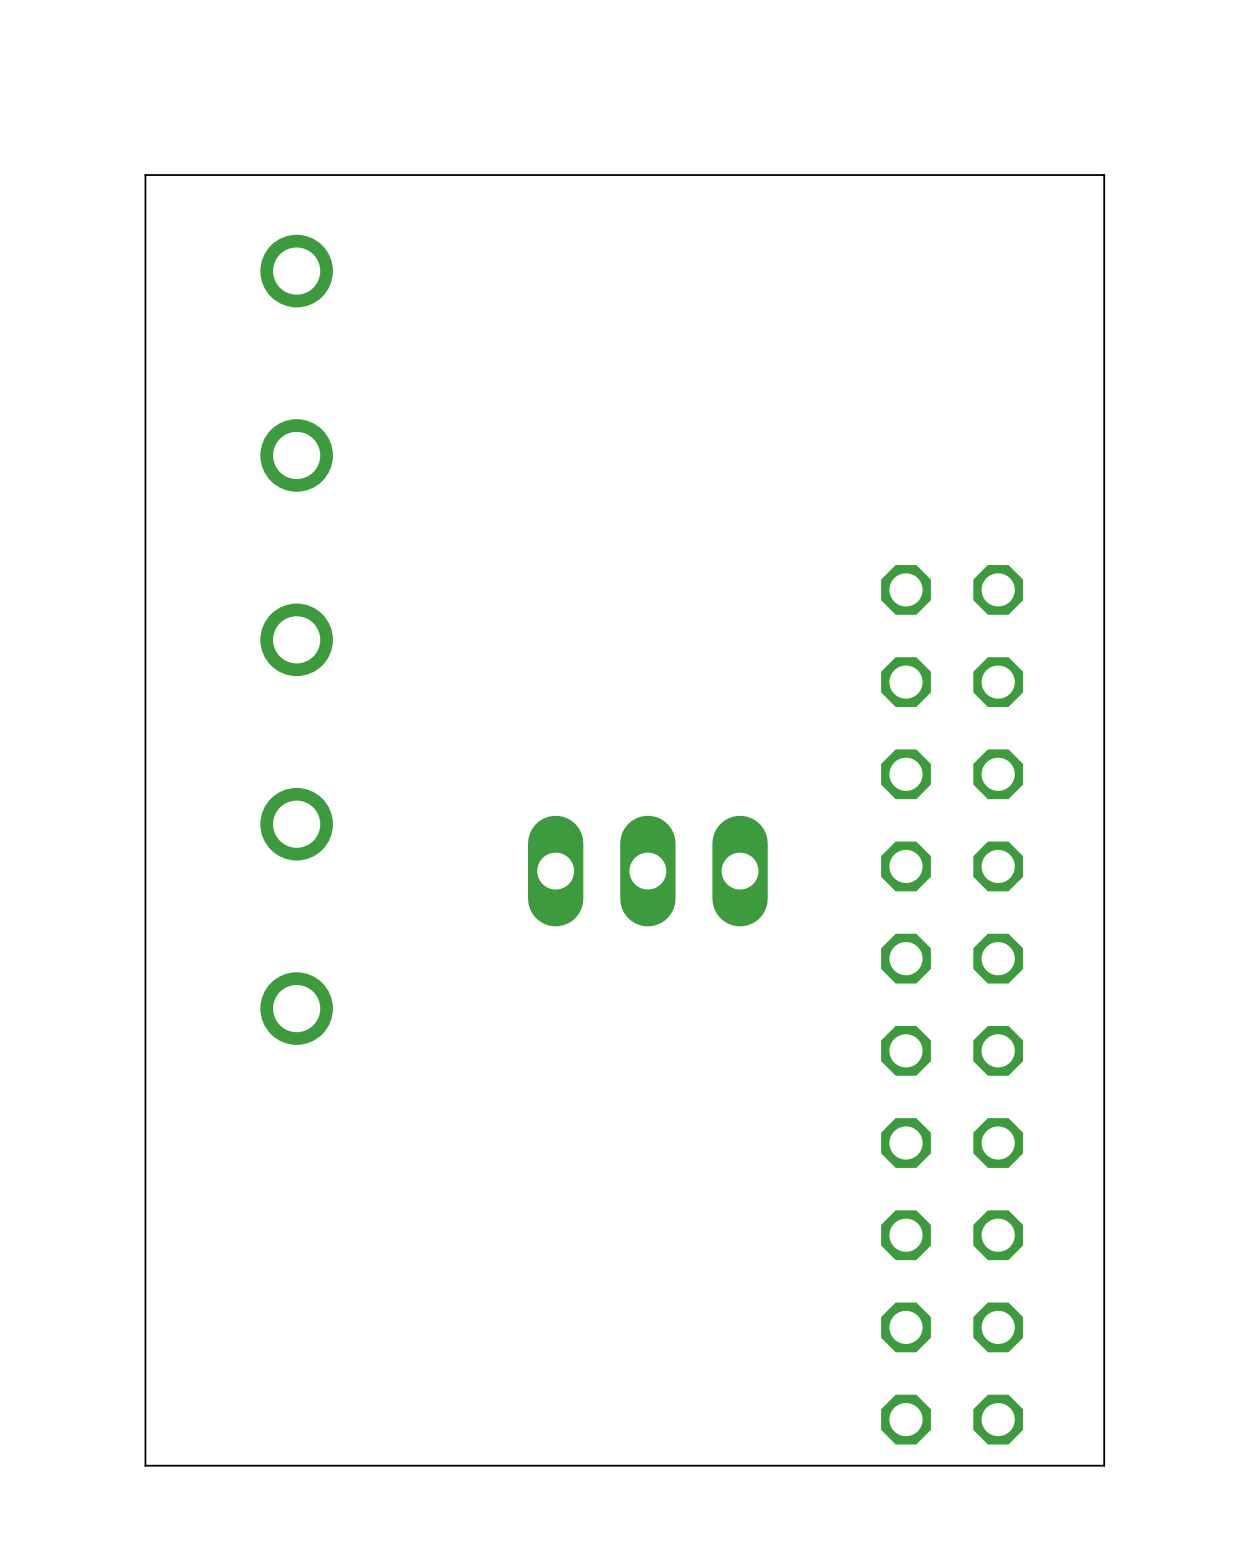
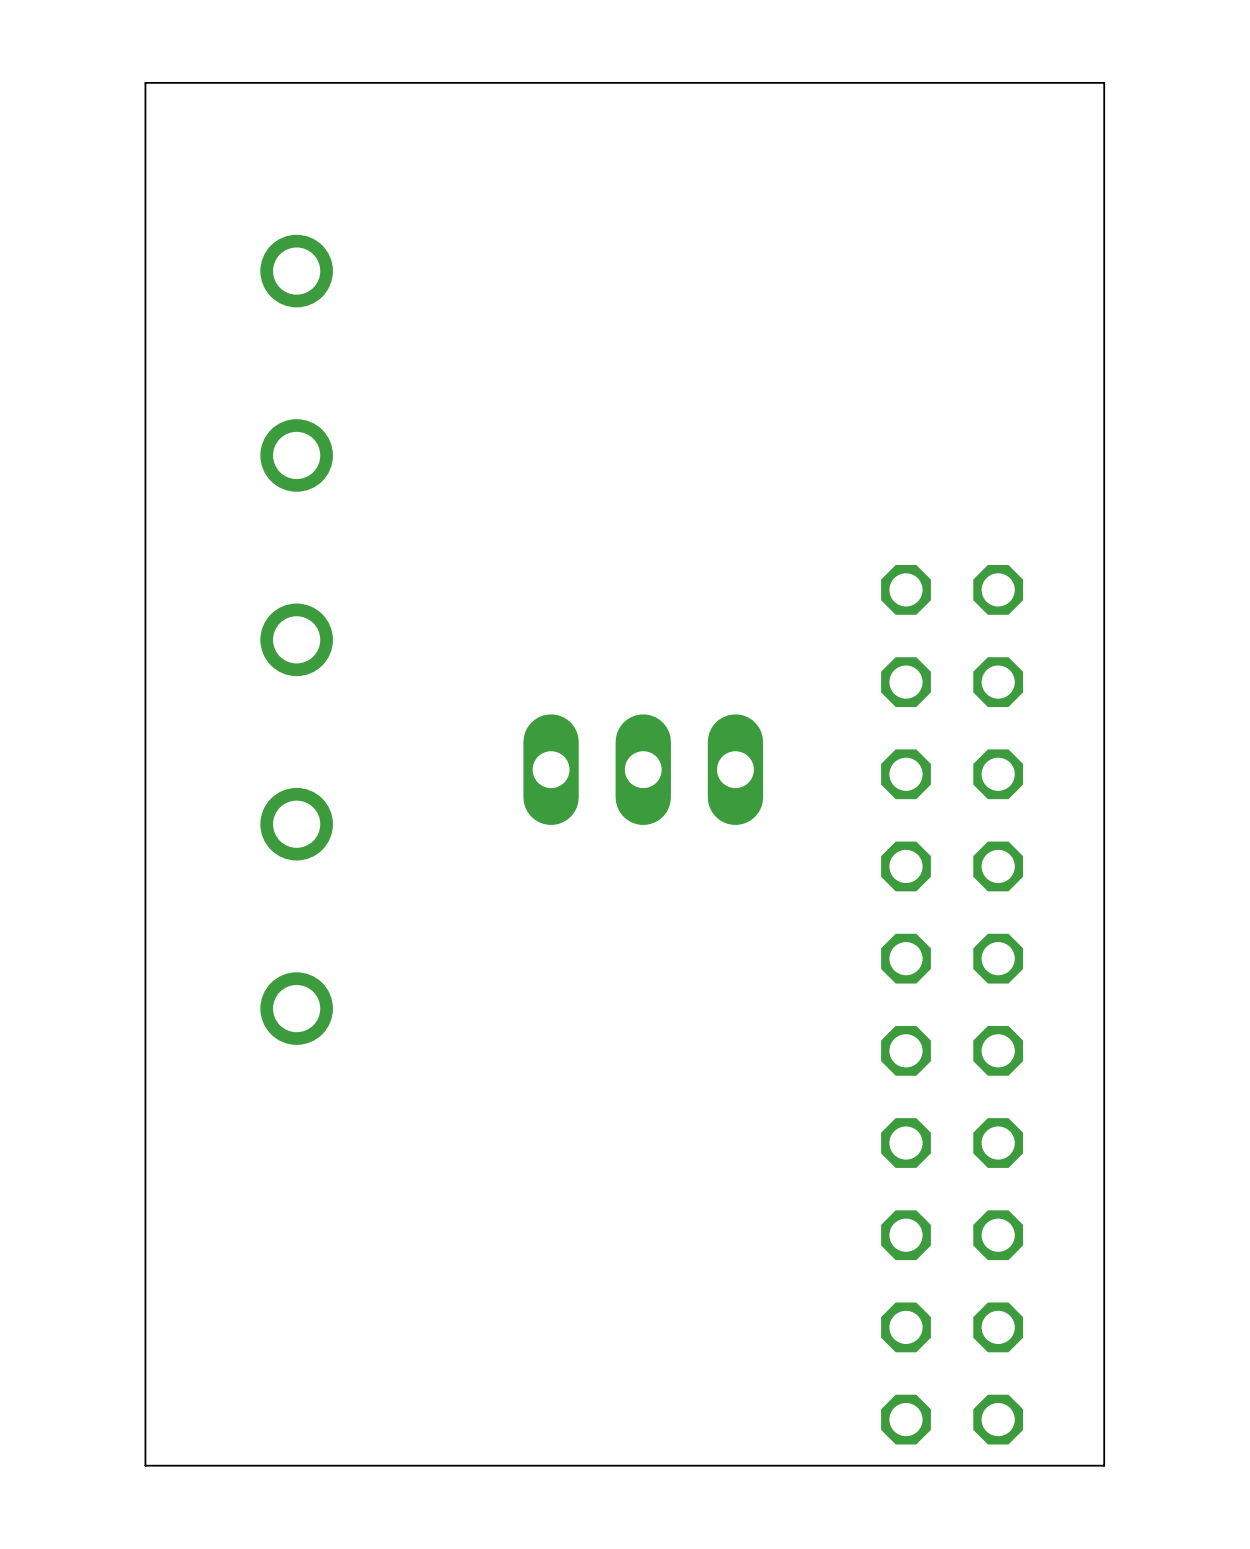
board edge: (1104, 175) (145, 175) -> (1104, 175) (1104, 82) (145, 82) (145, 175)
part position: (647, 871) -> (643, 769)

